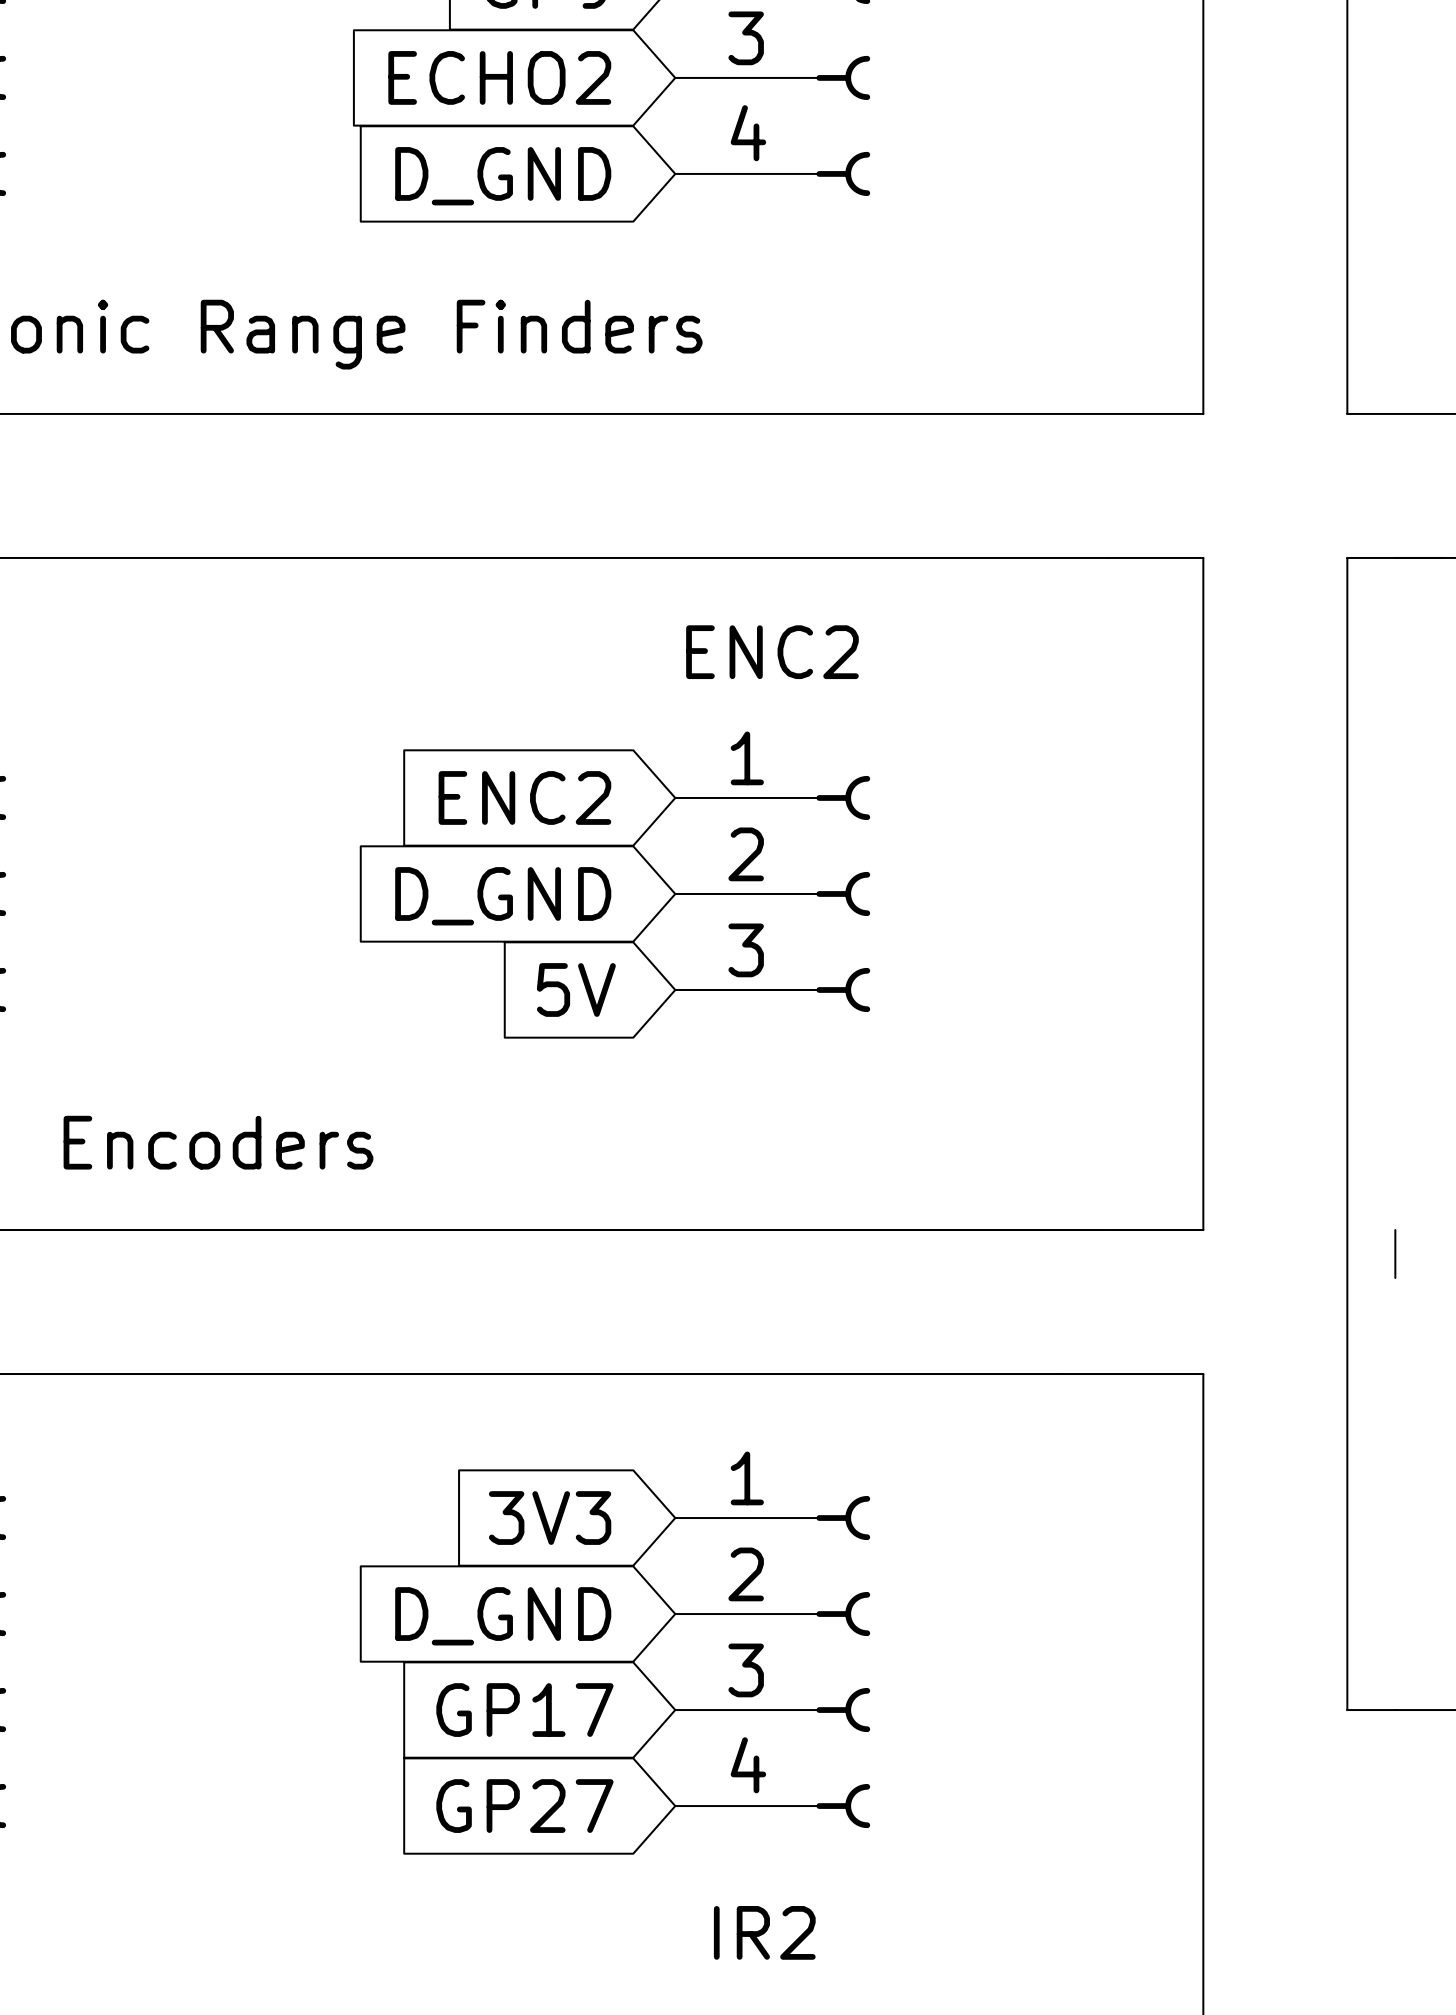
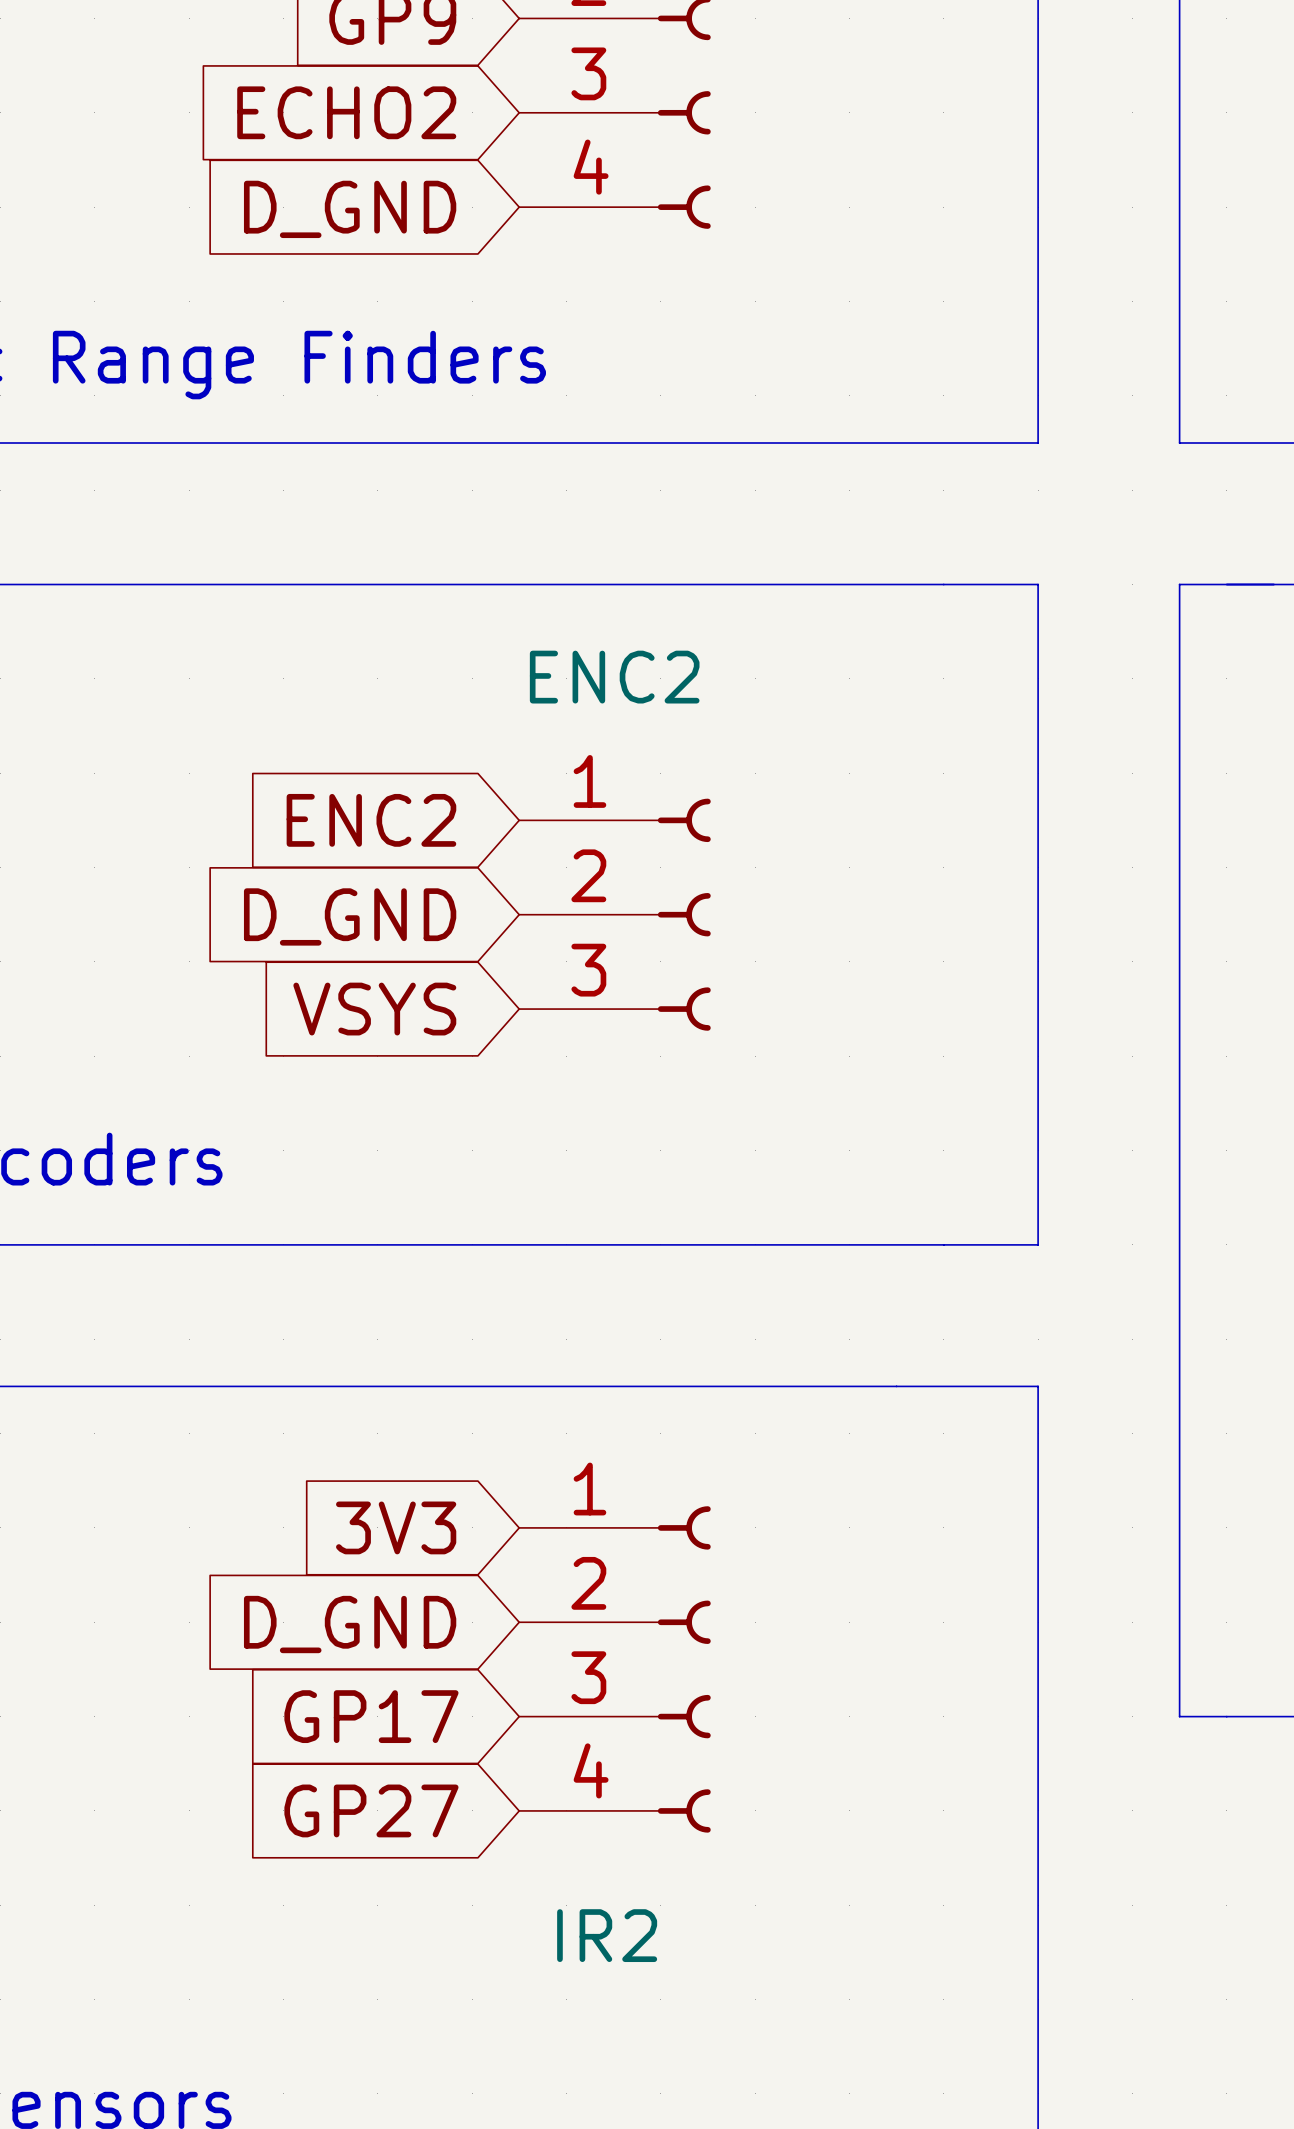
global label: 5V (576, 989) -> VSYS (374, 1009)
line: (1395, 1230) (1395, 1278) -> none

